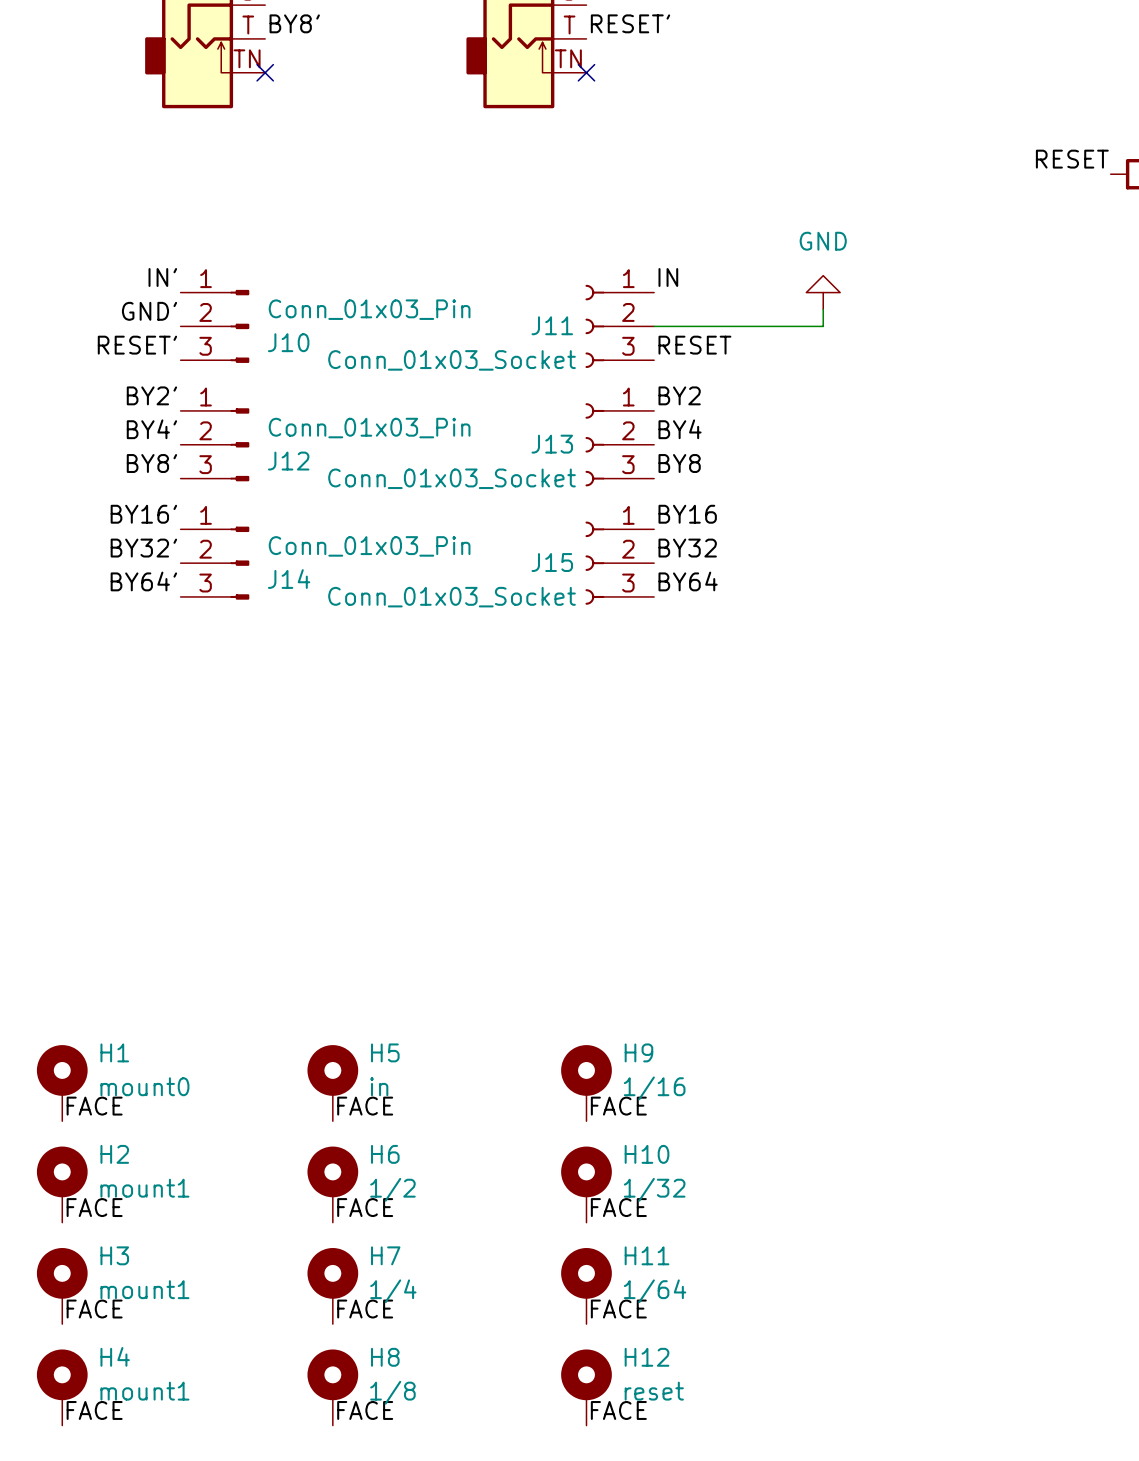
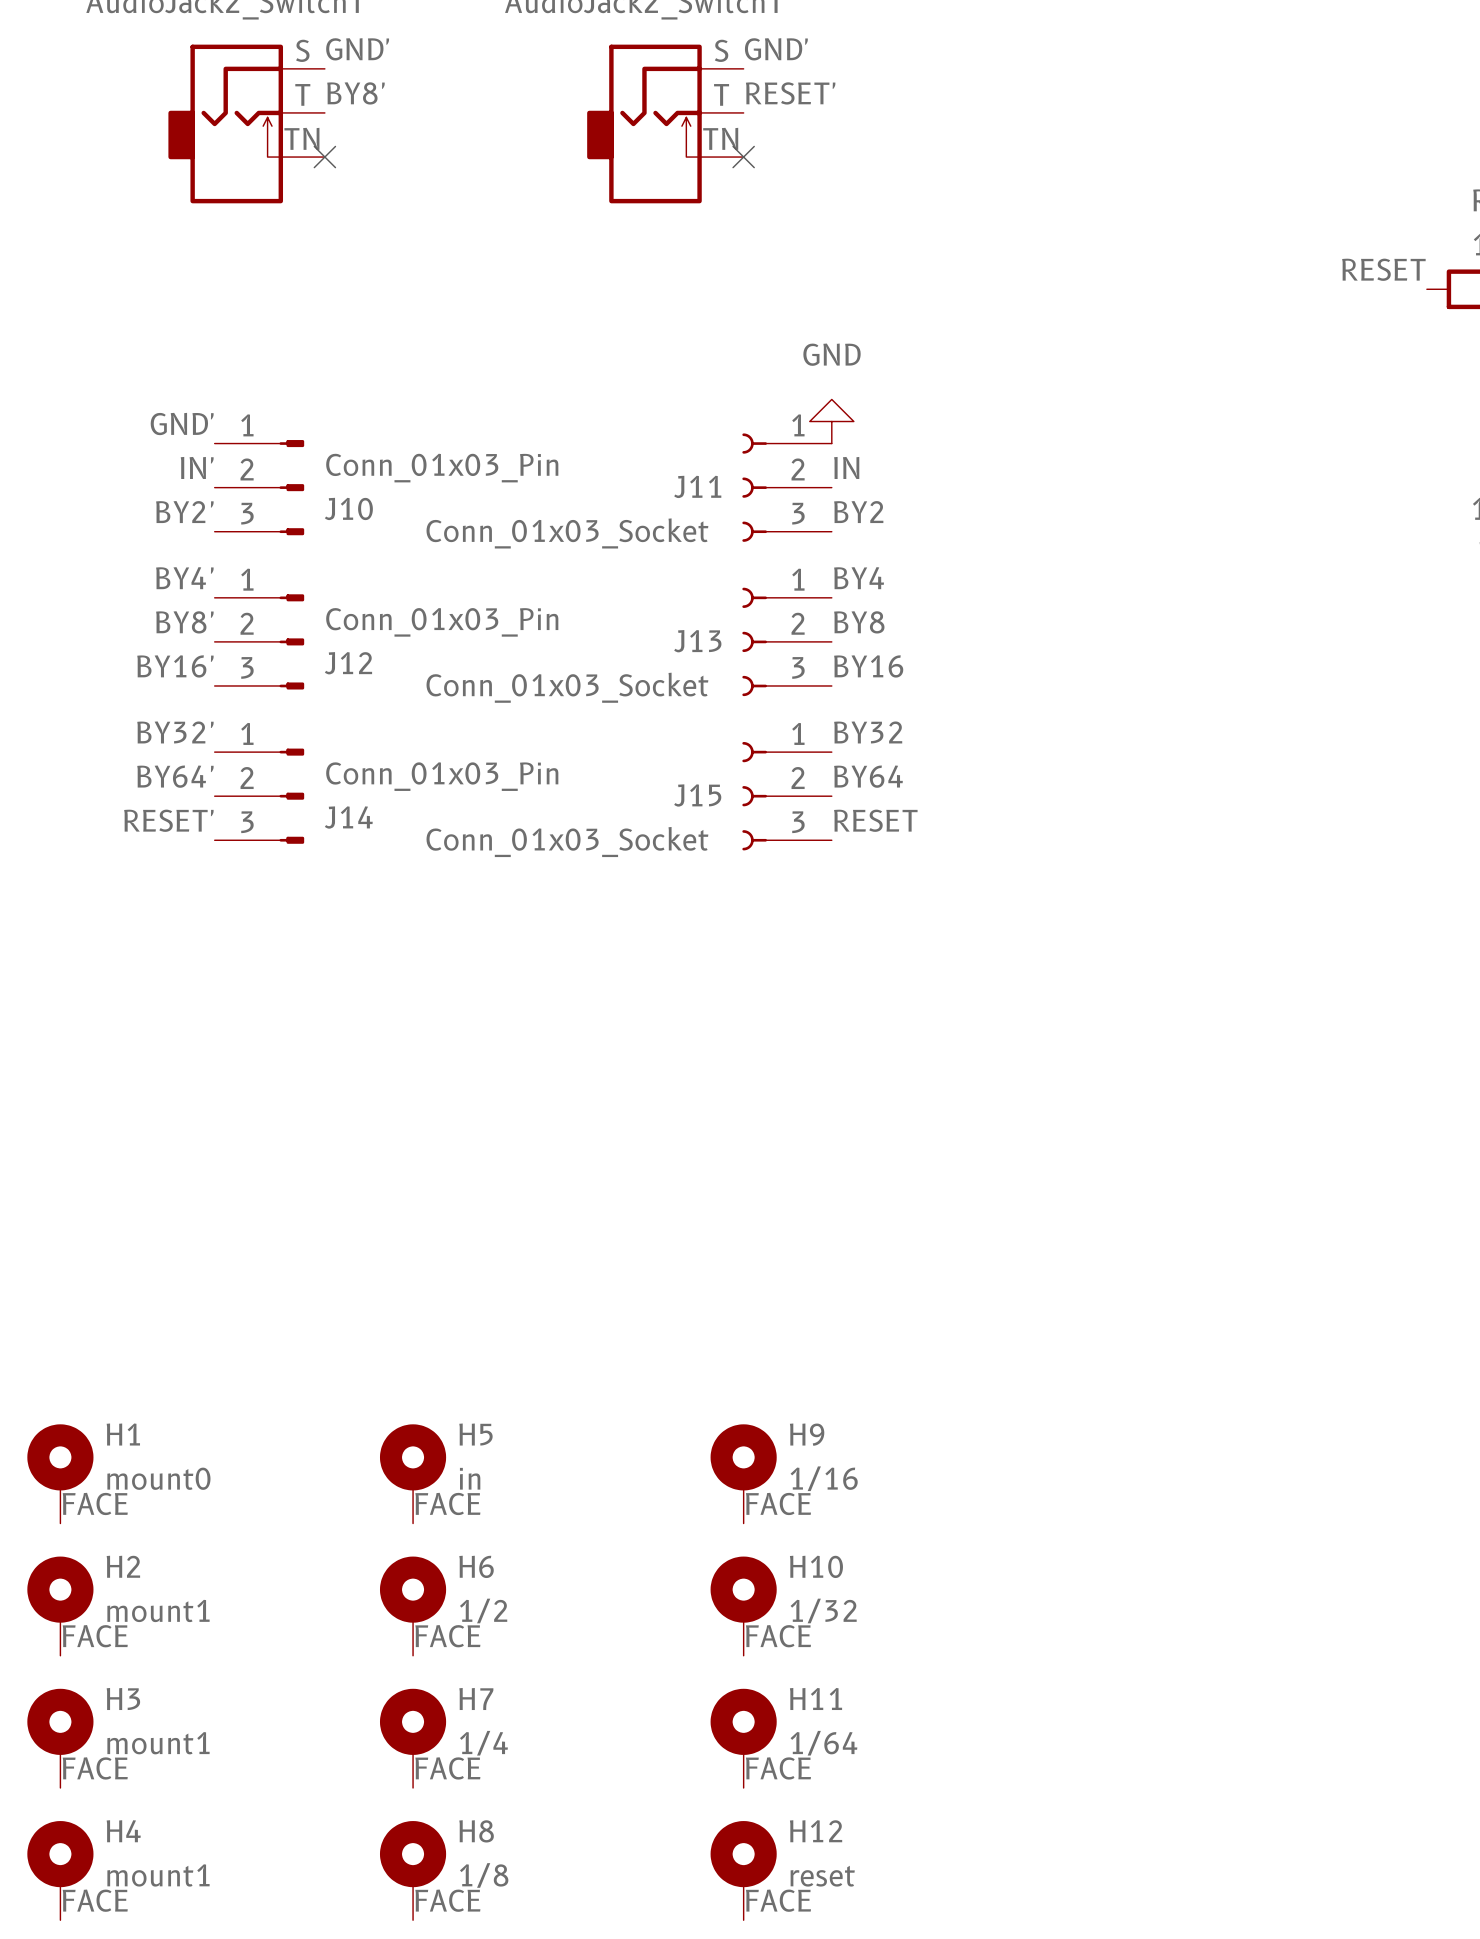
label: IN' (162, 277) -> GND' (182, 424)
label position: IN (668, 277) -> IN (846, 467)
power symbol position: GND (823, 292) -> GND (831, 421)
wire: (823, 309) (823, 326) (654, 326) -> none
label: GND' (149, 311) -> IN' (197, 467)
label: RESET' (137, 345) -> BY2' (184, 512)
label: RESET (694, 345) -> BY2 (858, 512)
label: BY2' (151, 395) -> BY4' (184, 578)
label: BY2 (679, 395) -> BY4 (859, 578)
label: BY4' (151, 429) -> BY8' (184, 622)
label: BY4 (680, 429) -> BY8 (859, 622)
label: BY8' (151, 463) -> BY16' (175, 666)
label: BY8 (679, 463) -> BY16 (868, 666)
label: BY16' (143, 514) -> BY32' (175, 732)
label: BY16 (687, 514) -> BY32 (868, 732)
label: BY32' (143, 548) -> BY64' (175, 776)
label: BY32 (687, 548) -> BY64 (868, 776)
label: BY64' (143, 581) -> RESET' (168, 820)
label: BY64 (688, 581) -> RESET (875, 820)

